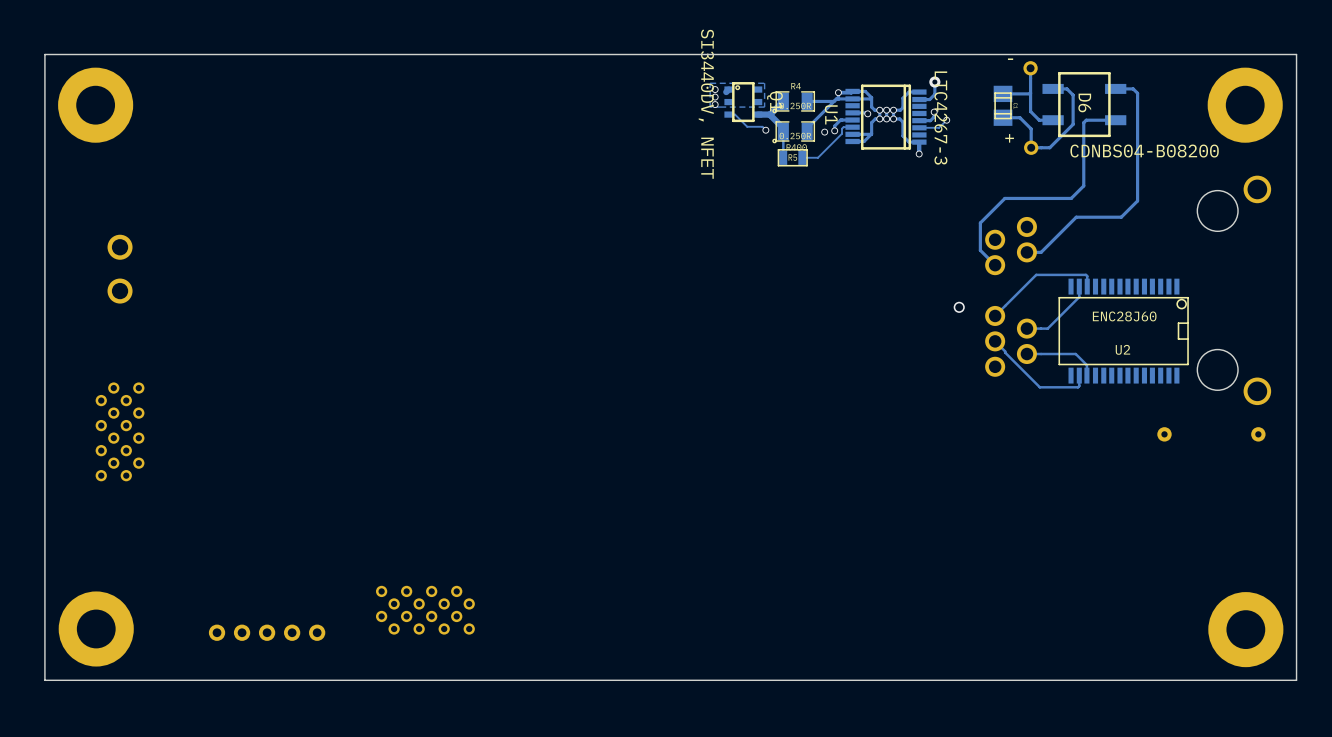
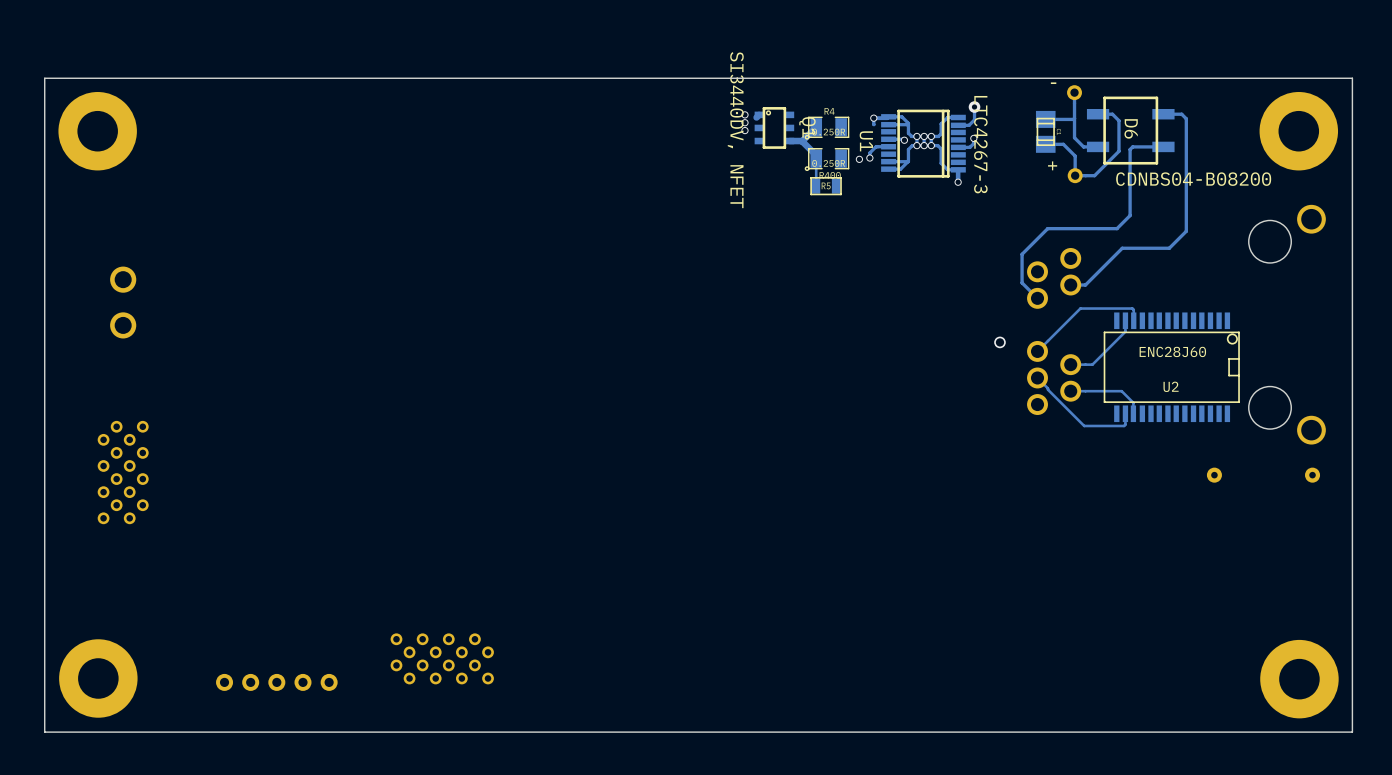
zone outline: (764, 83) (710, 83) (710, 107) (764, 107) (764, 83) -> none
track: (852, 98) (836, 98) (807, 128) (807, 131) -> none
track: (834, 101) (807, 101) -> none
track: (728, 114) (735, 114) (747, 126) (762, 126) (765, 130) -> none
track: (946, 120) (939, 127) (919, 127) -> none
via: (946, 120) -> none
track: (852, 127) (843, 127) (842, 133) (817, 157) (802, 157) -> none
via: (765, 130) -> none

